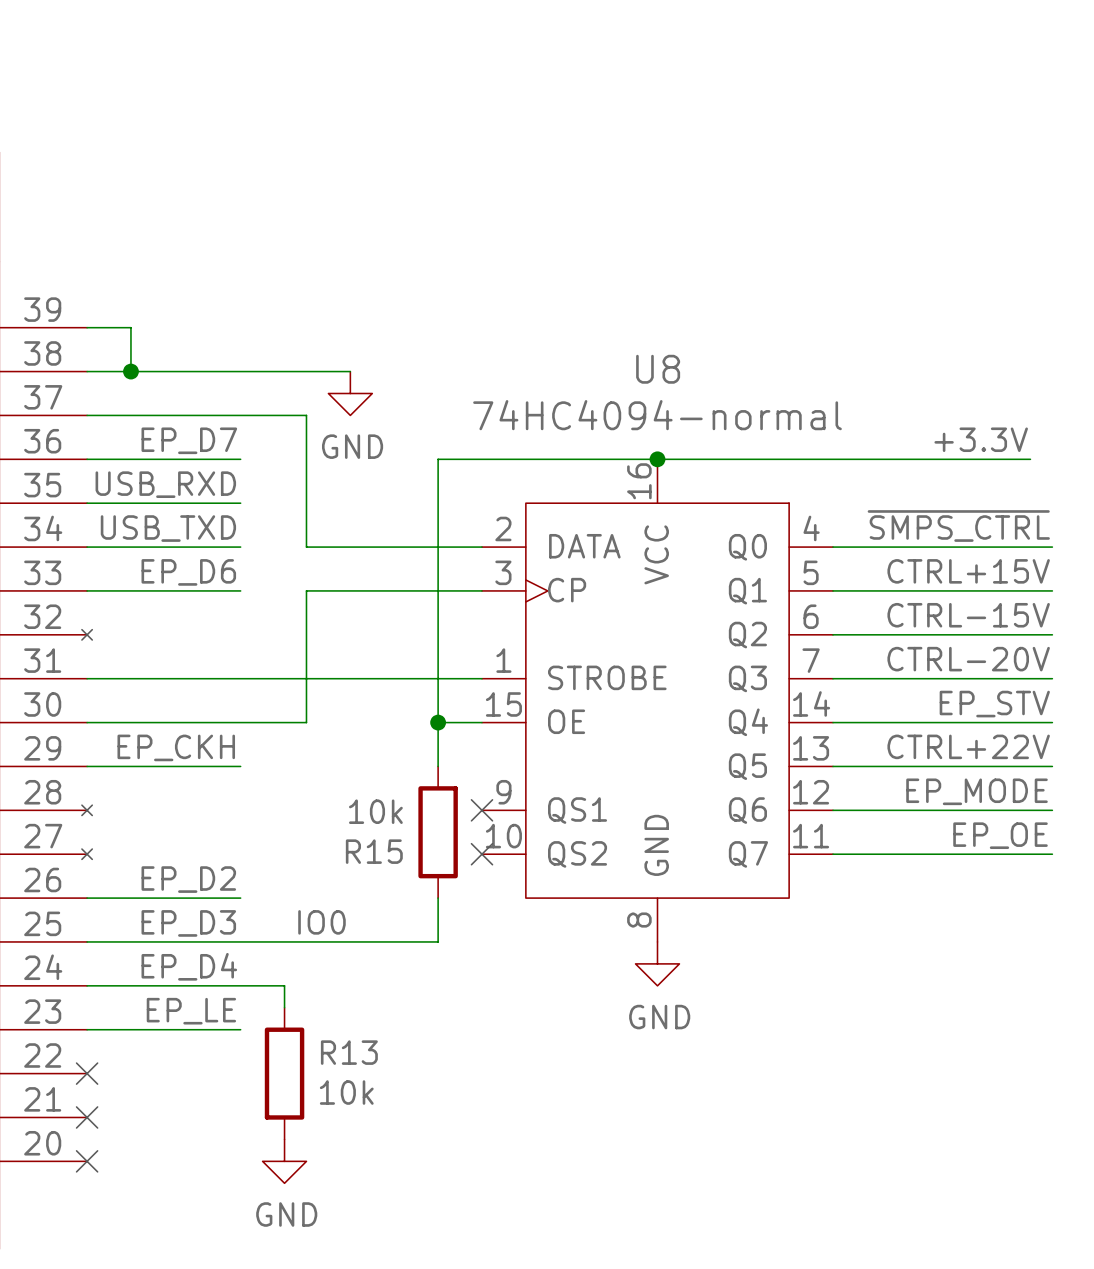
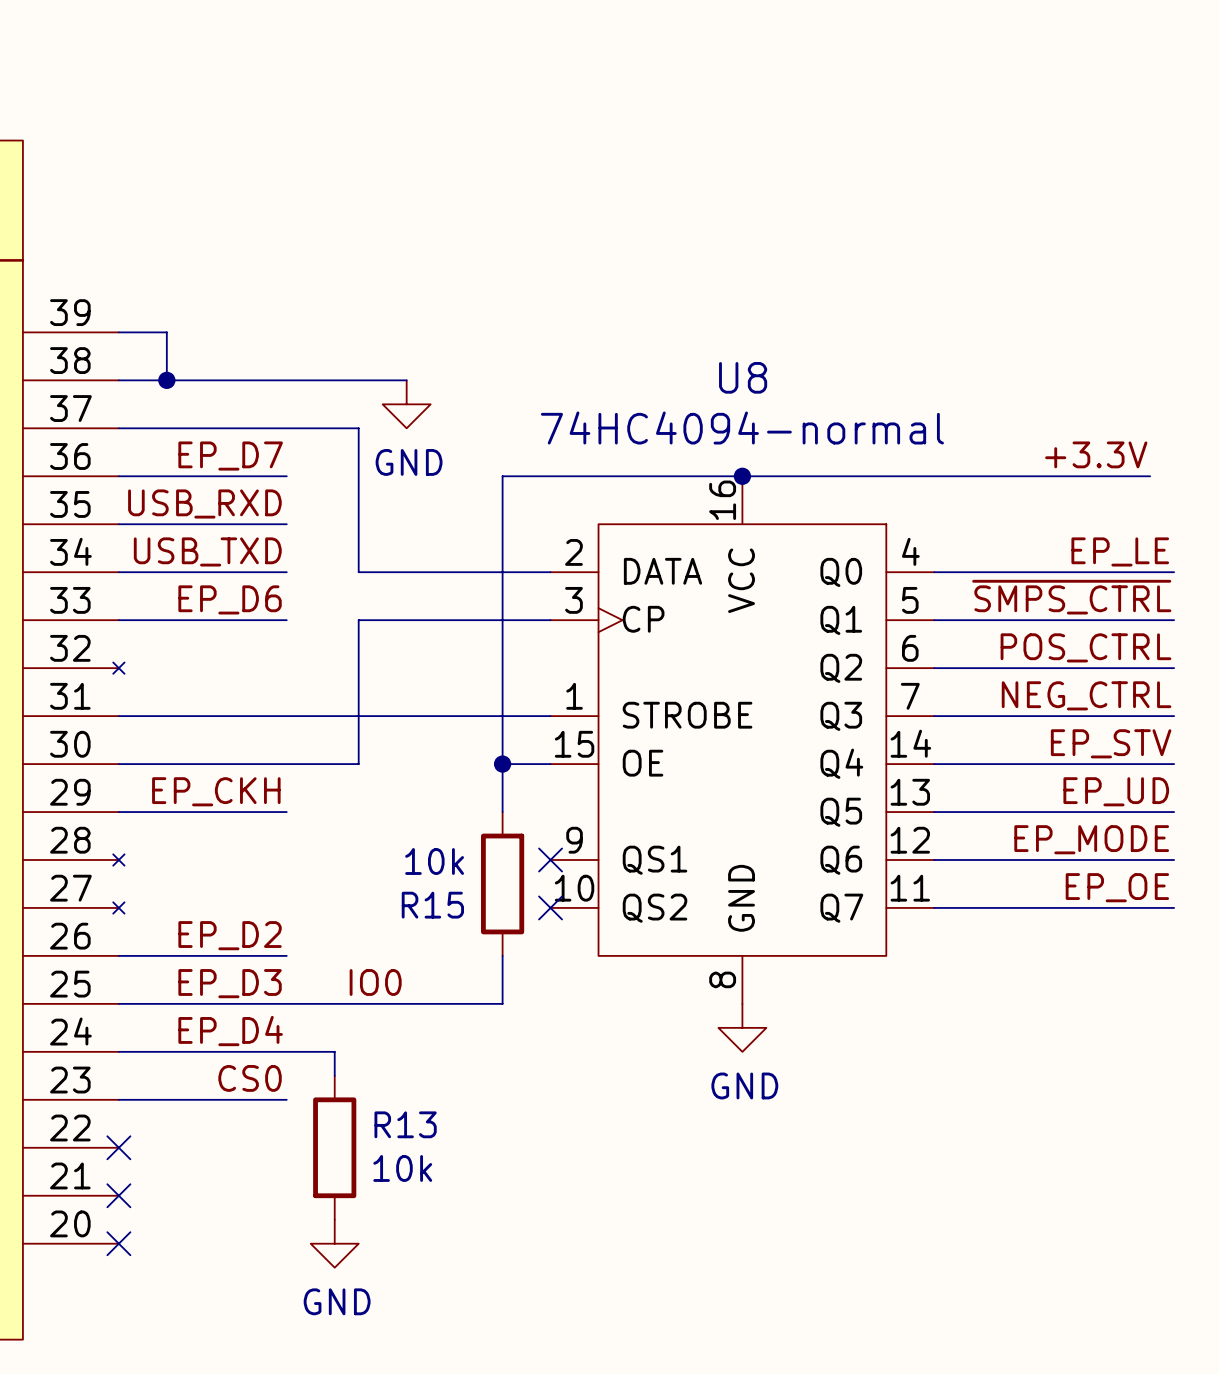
label: ~{SMPS_CTRL} (958, 526) -> EP_LE (1120, 551)
label: CTRL+15V (968, 571) -> ~{SMPS_CTRL} (1071, 597)
label: CTRL-15V (968, 615) -> POS_CTRL (1085, 647)
label: CTRL-20V (968, 659) -> NEG_CTRL (1086, 695)
label: CTRL+22V (968, 746) -> EP_UD (1116, 791)
label: EP_LE (191, 1011) -> CS0 (250, 1078)

